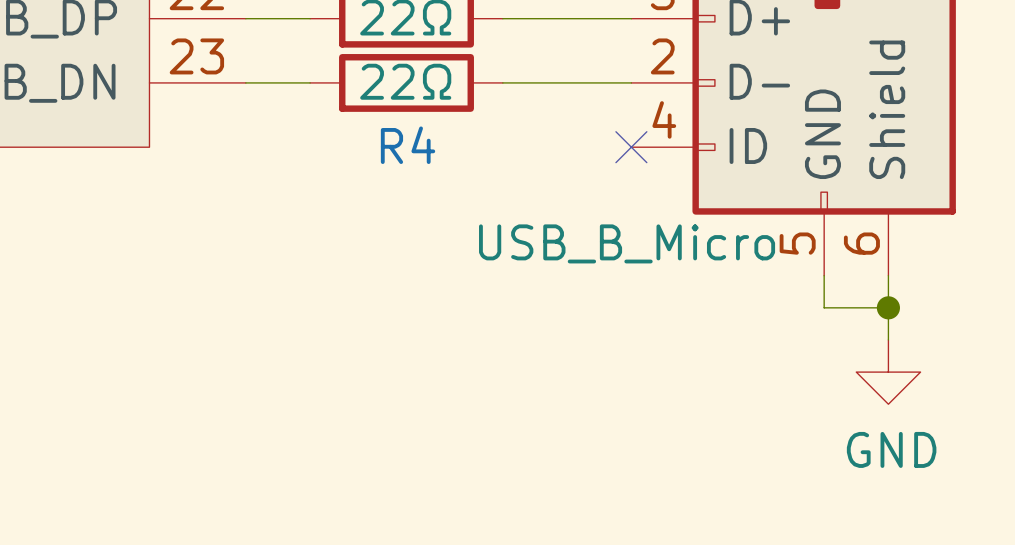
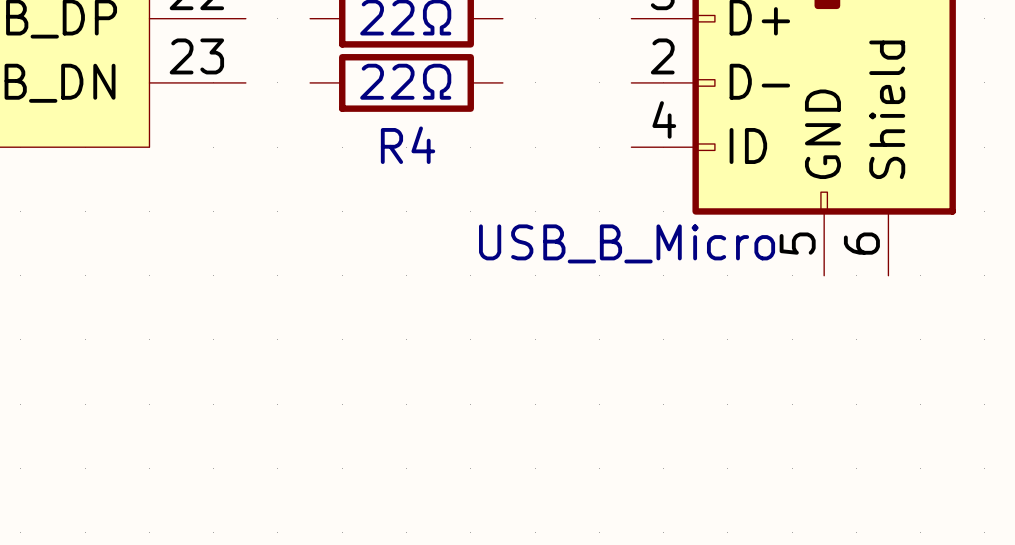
wire: (245, 18) (310, 18) -> none
wire: (502, 18) (631, 18) -> none
wire: (245, 82) (310, 82) -> none
wire: (502, 82) (631, 82) -> none
no-connect mark: (631, 147) -> none
wire: (824, 275) (824, 307) (888, 307) -> none
wire: (888, 275) (888, 339) -> none
junction: (888, 307) -> none
power symbol: GND (888, 372) -> none

